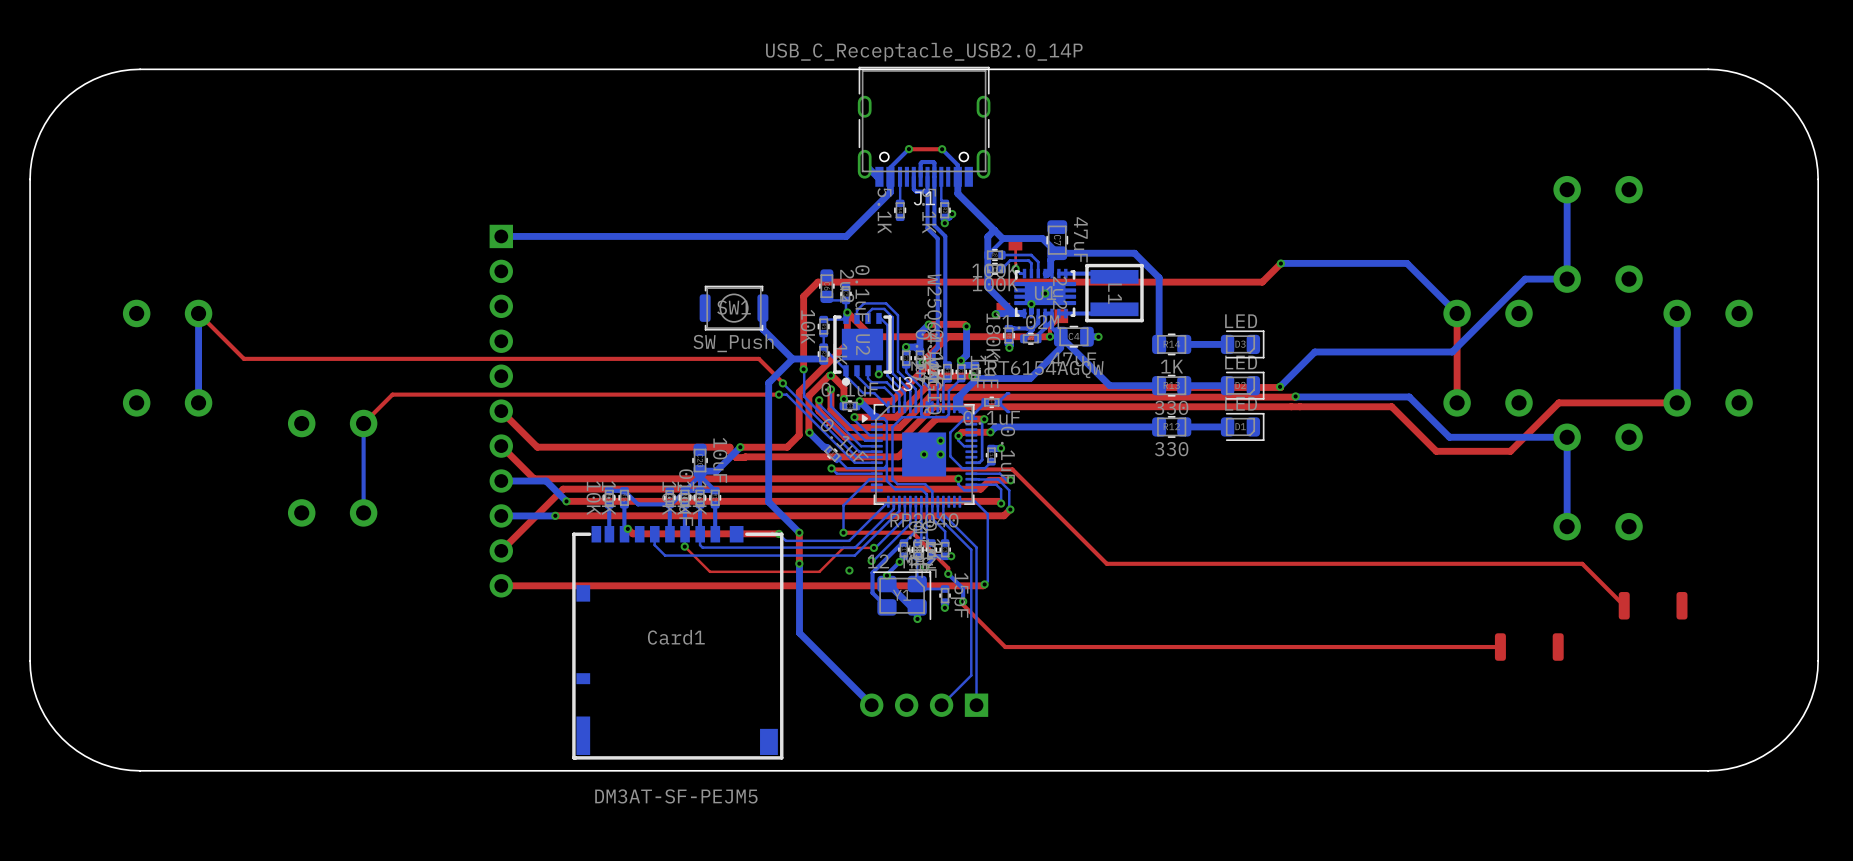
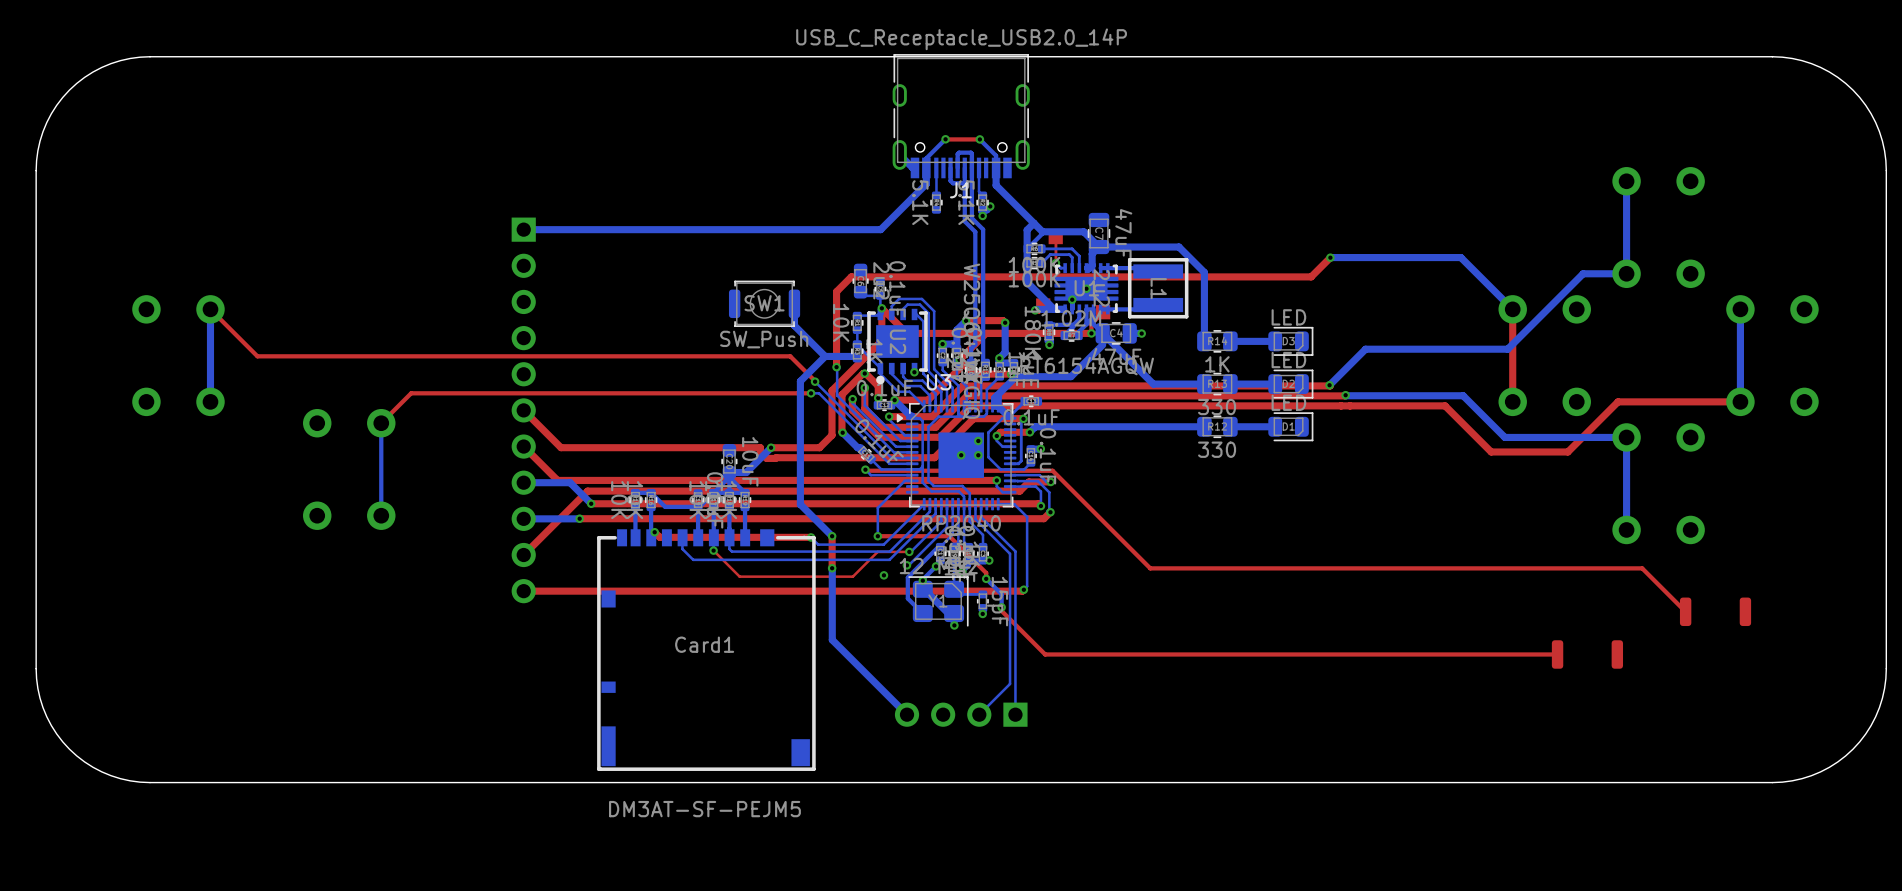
bottom track: (1009, 393) (998, 402) (1009, 411) -> none

